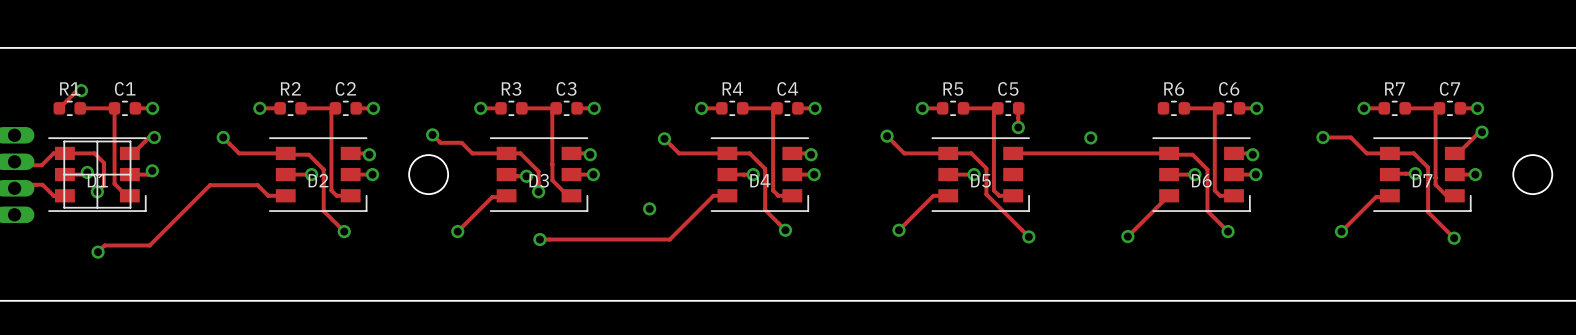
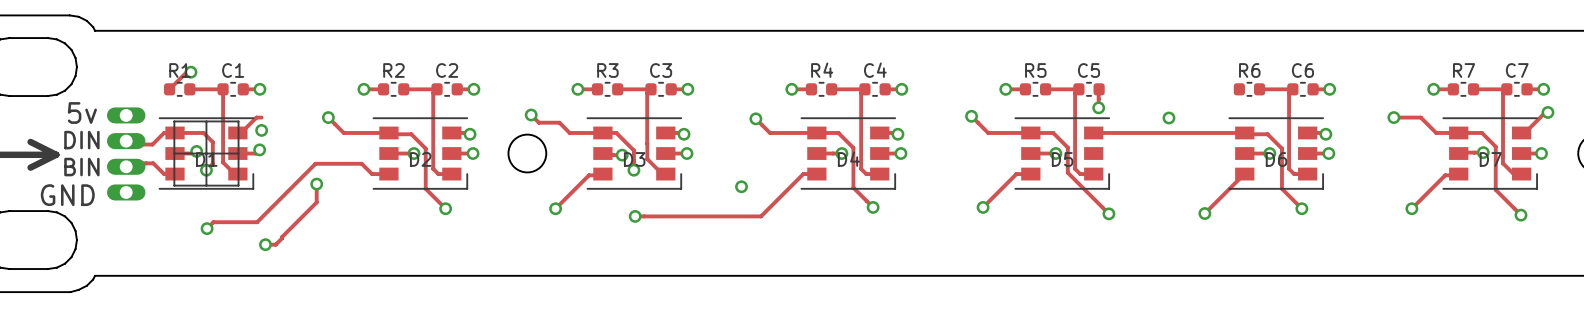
via position: (154, 137) -> (261, 130)
track: none -> (316, 184) (316, 202) (275, 244) (265, 244)
via: none -> (316, 184)
via: none -> (265, 244)

